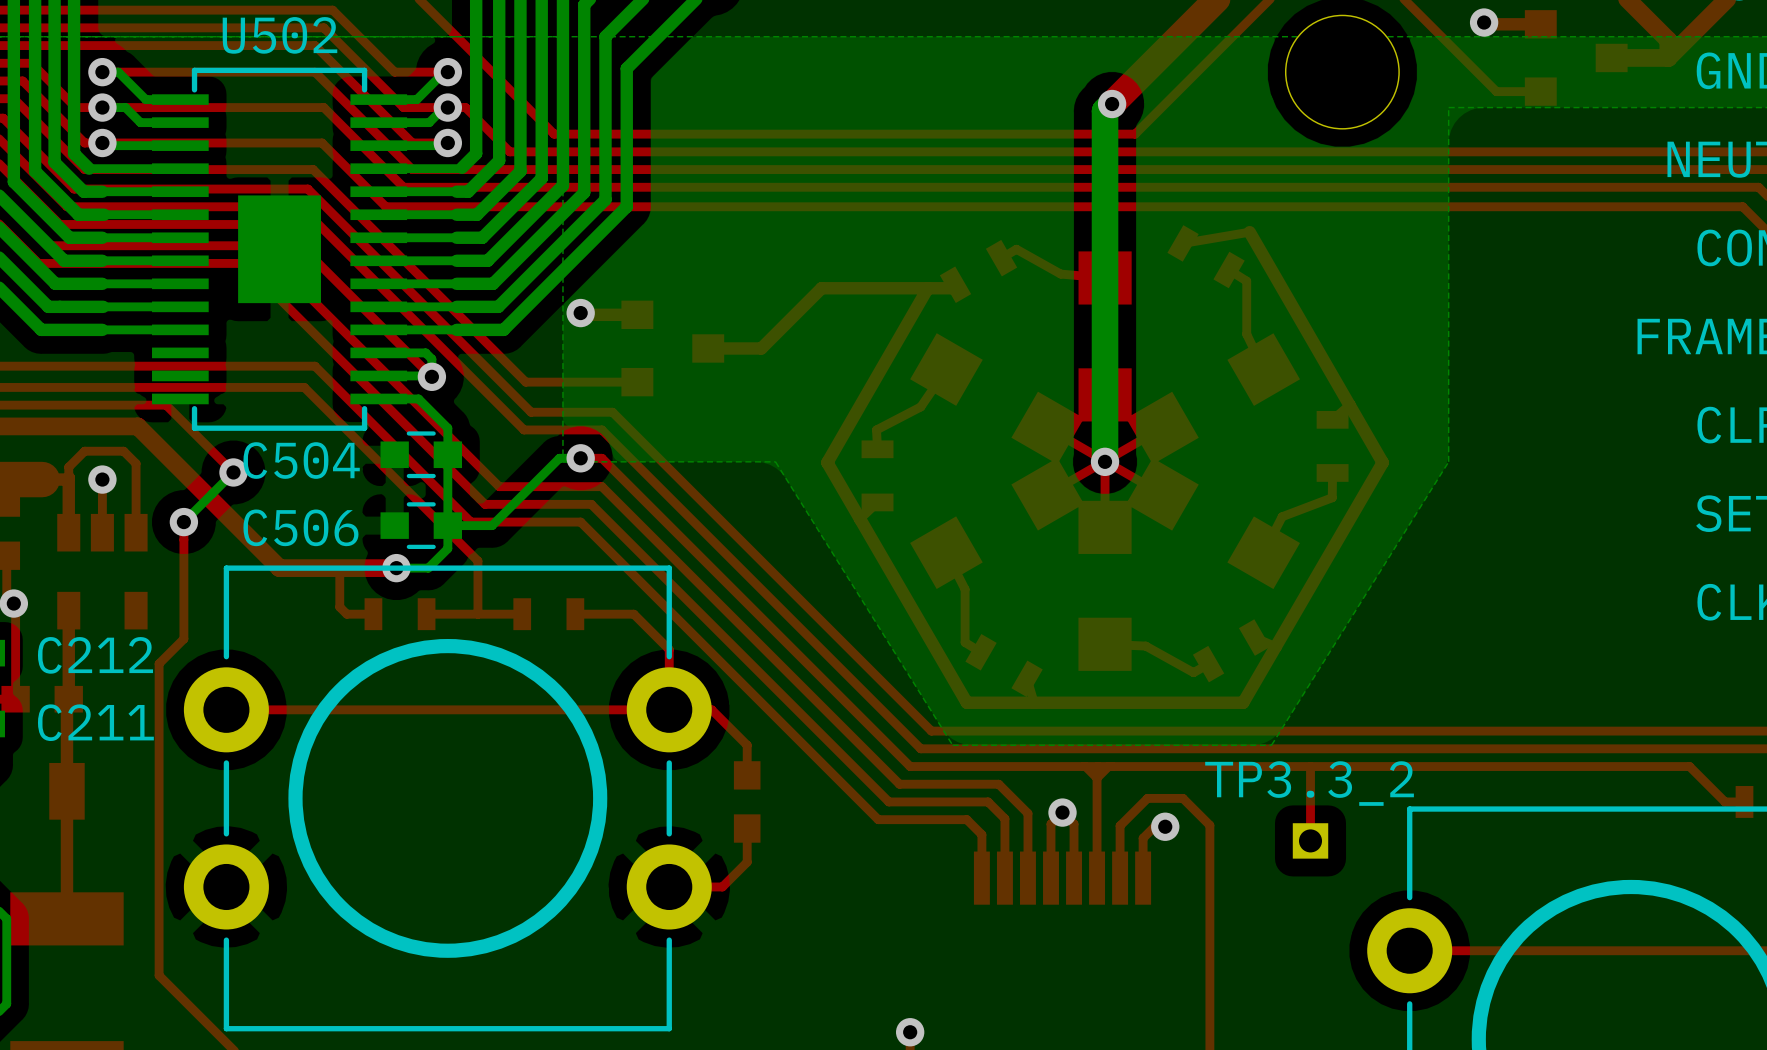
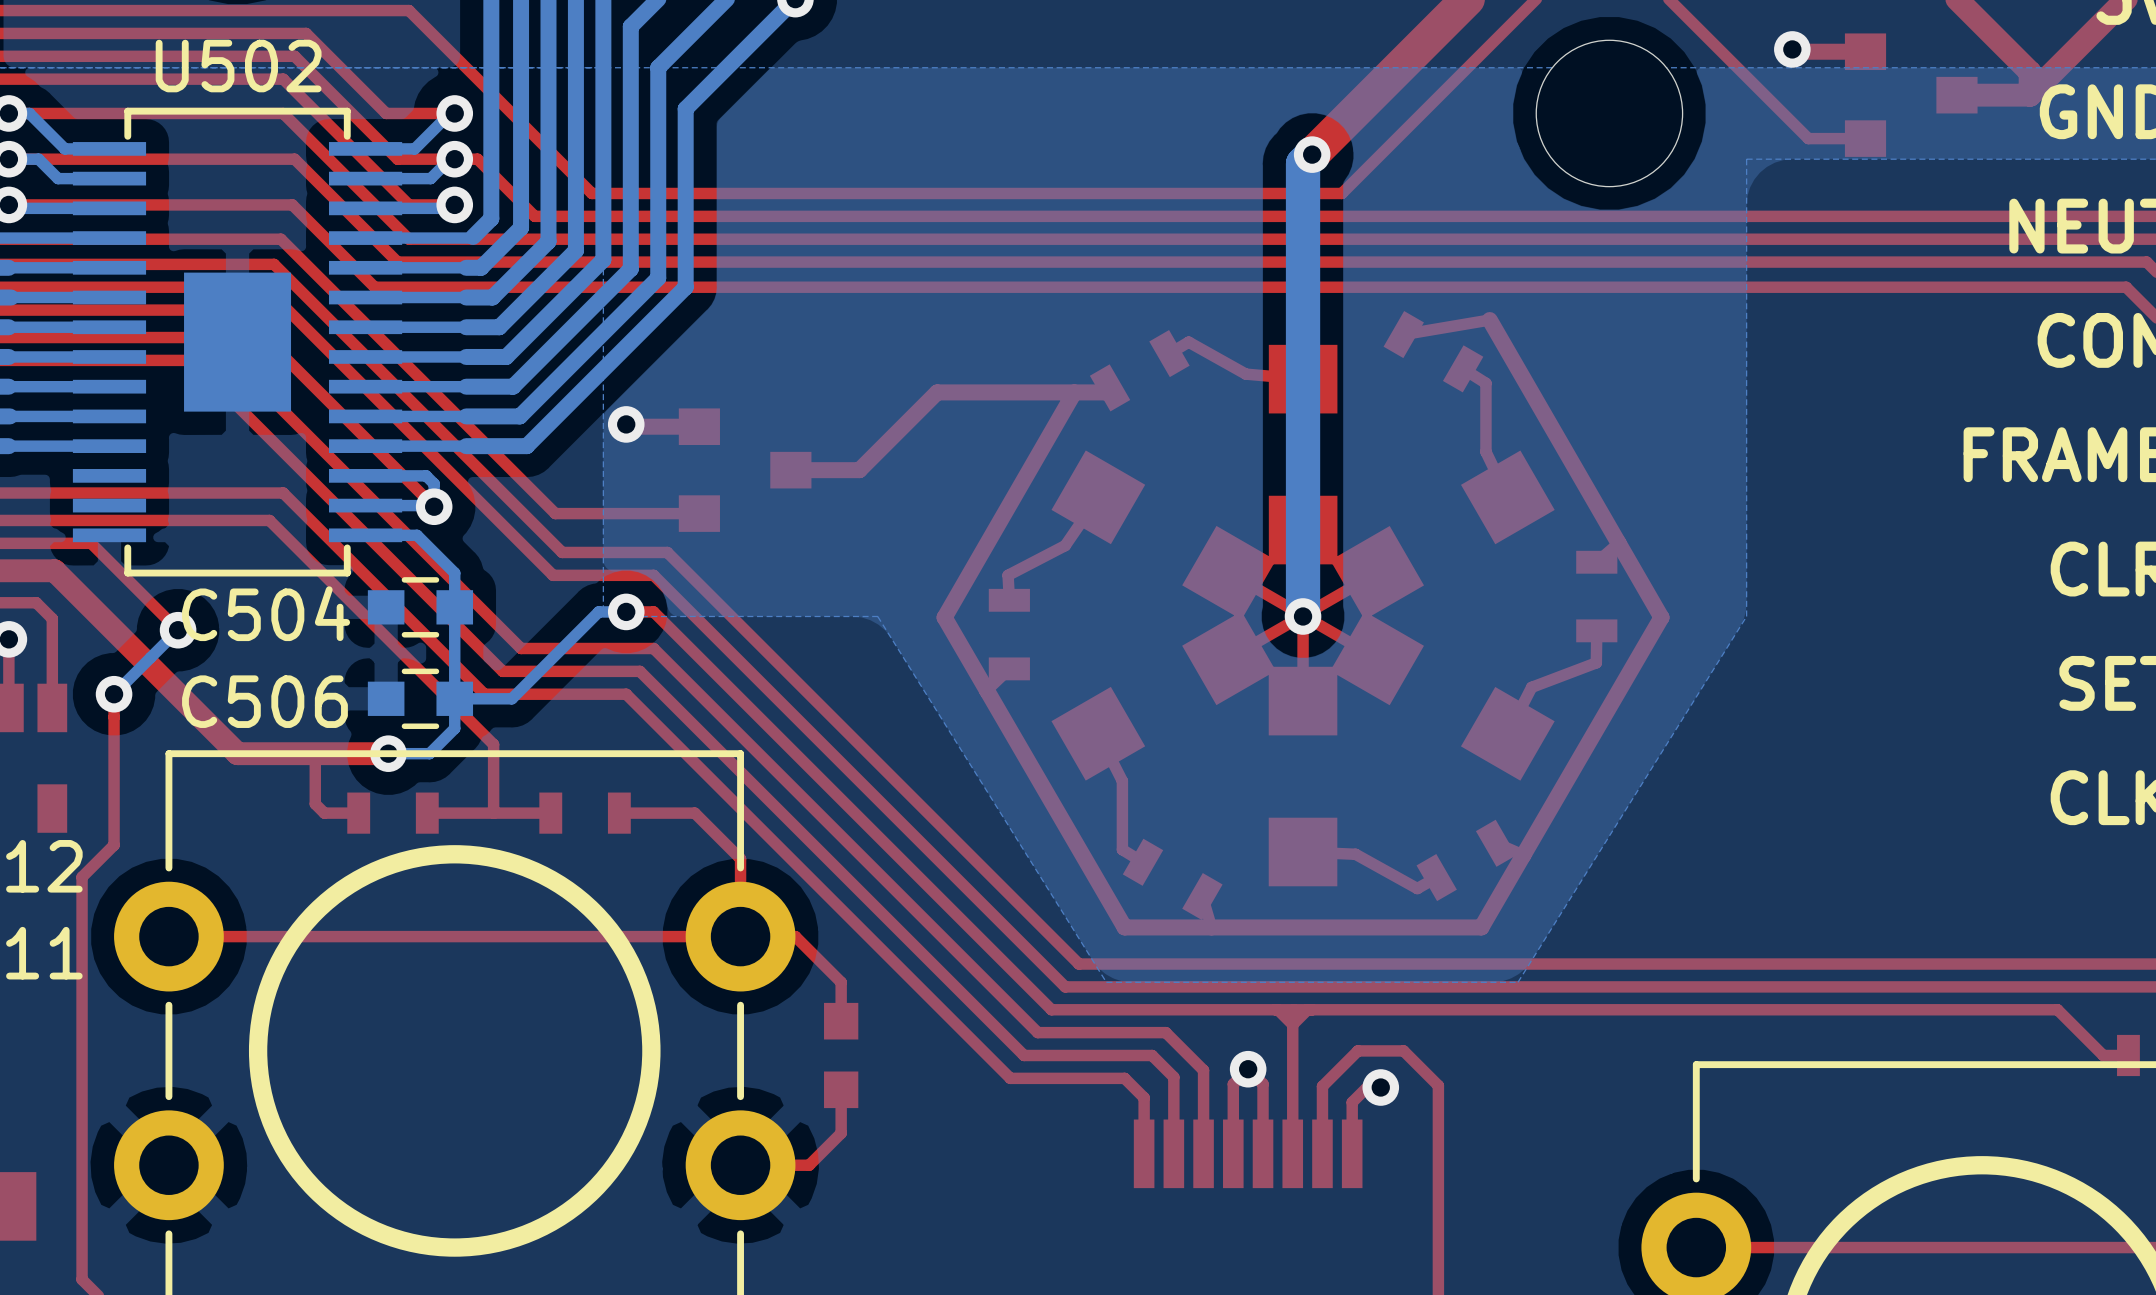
top track: (1310, 766) (1310, 840) -> none
TP3.3_2: (1310, 840) -> none

